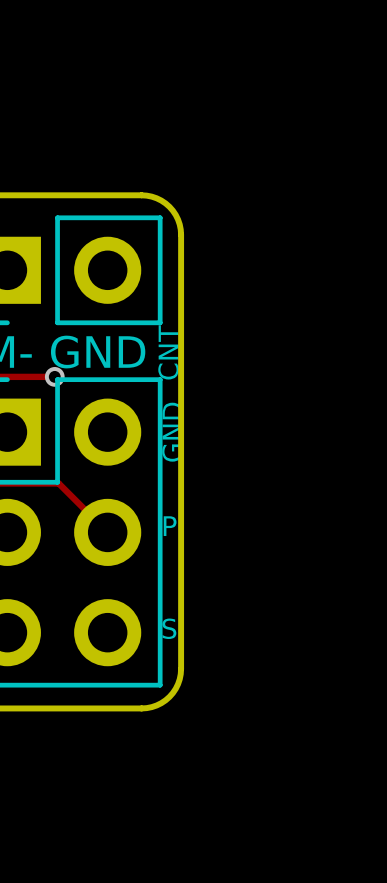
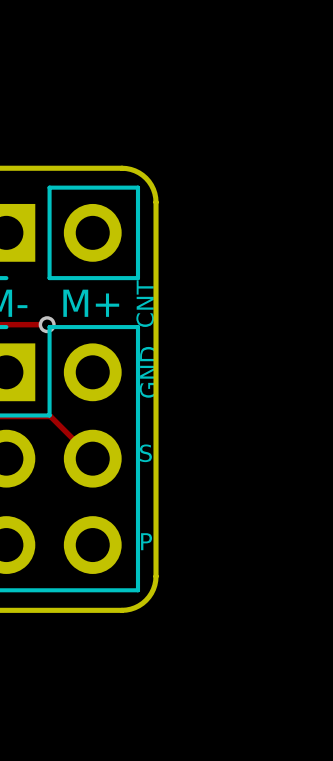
text: GND (98, 352) -> M+ (91, 303)
text: P (170, 526) -> S (145, 453)
text: S (169, 628) -> P (146, 541)

